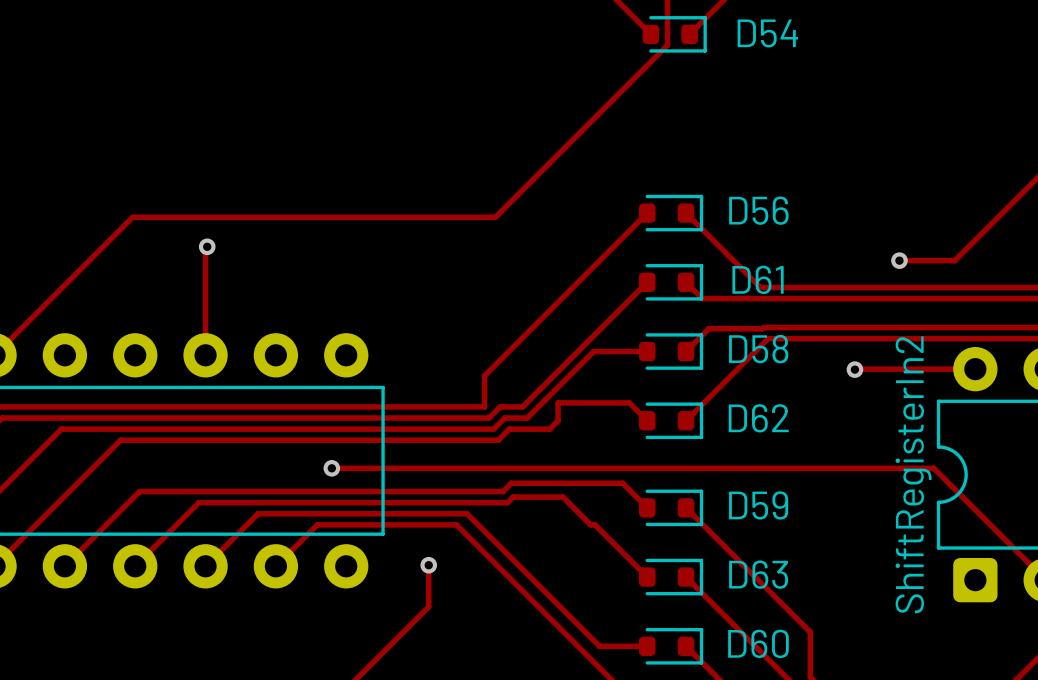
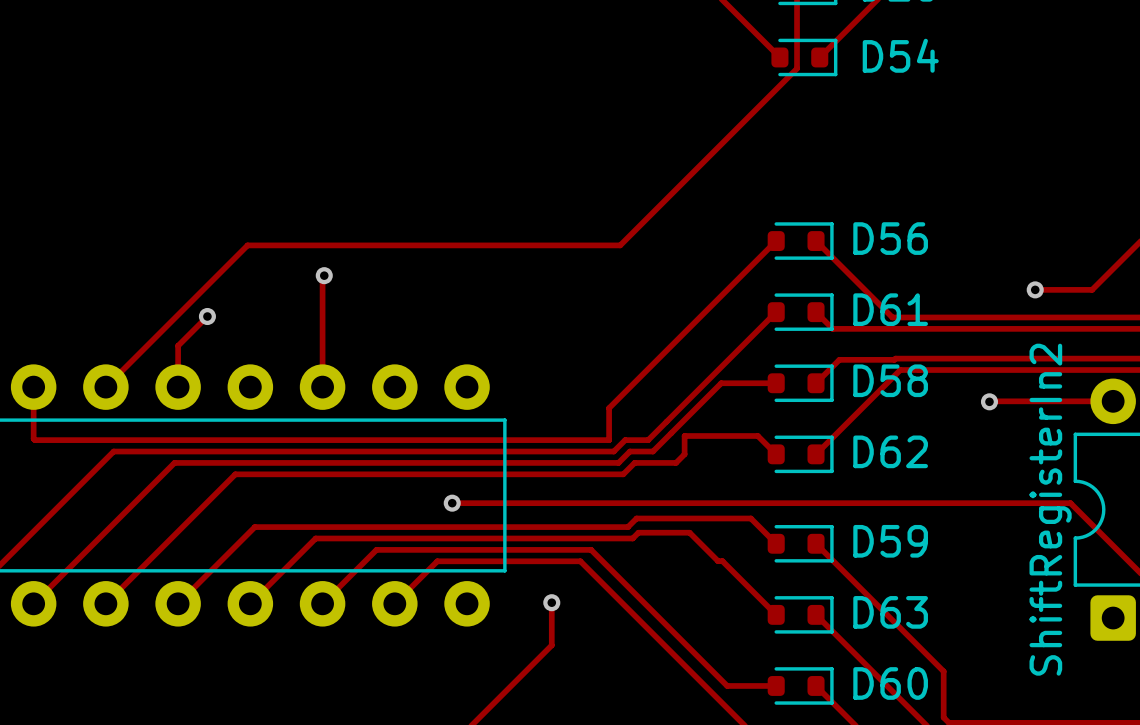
track: none -> (207, 316) (178, 345) (178, 387)
via: none -> (207, 316)

